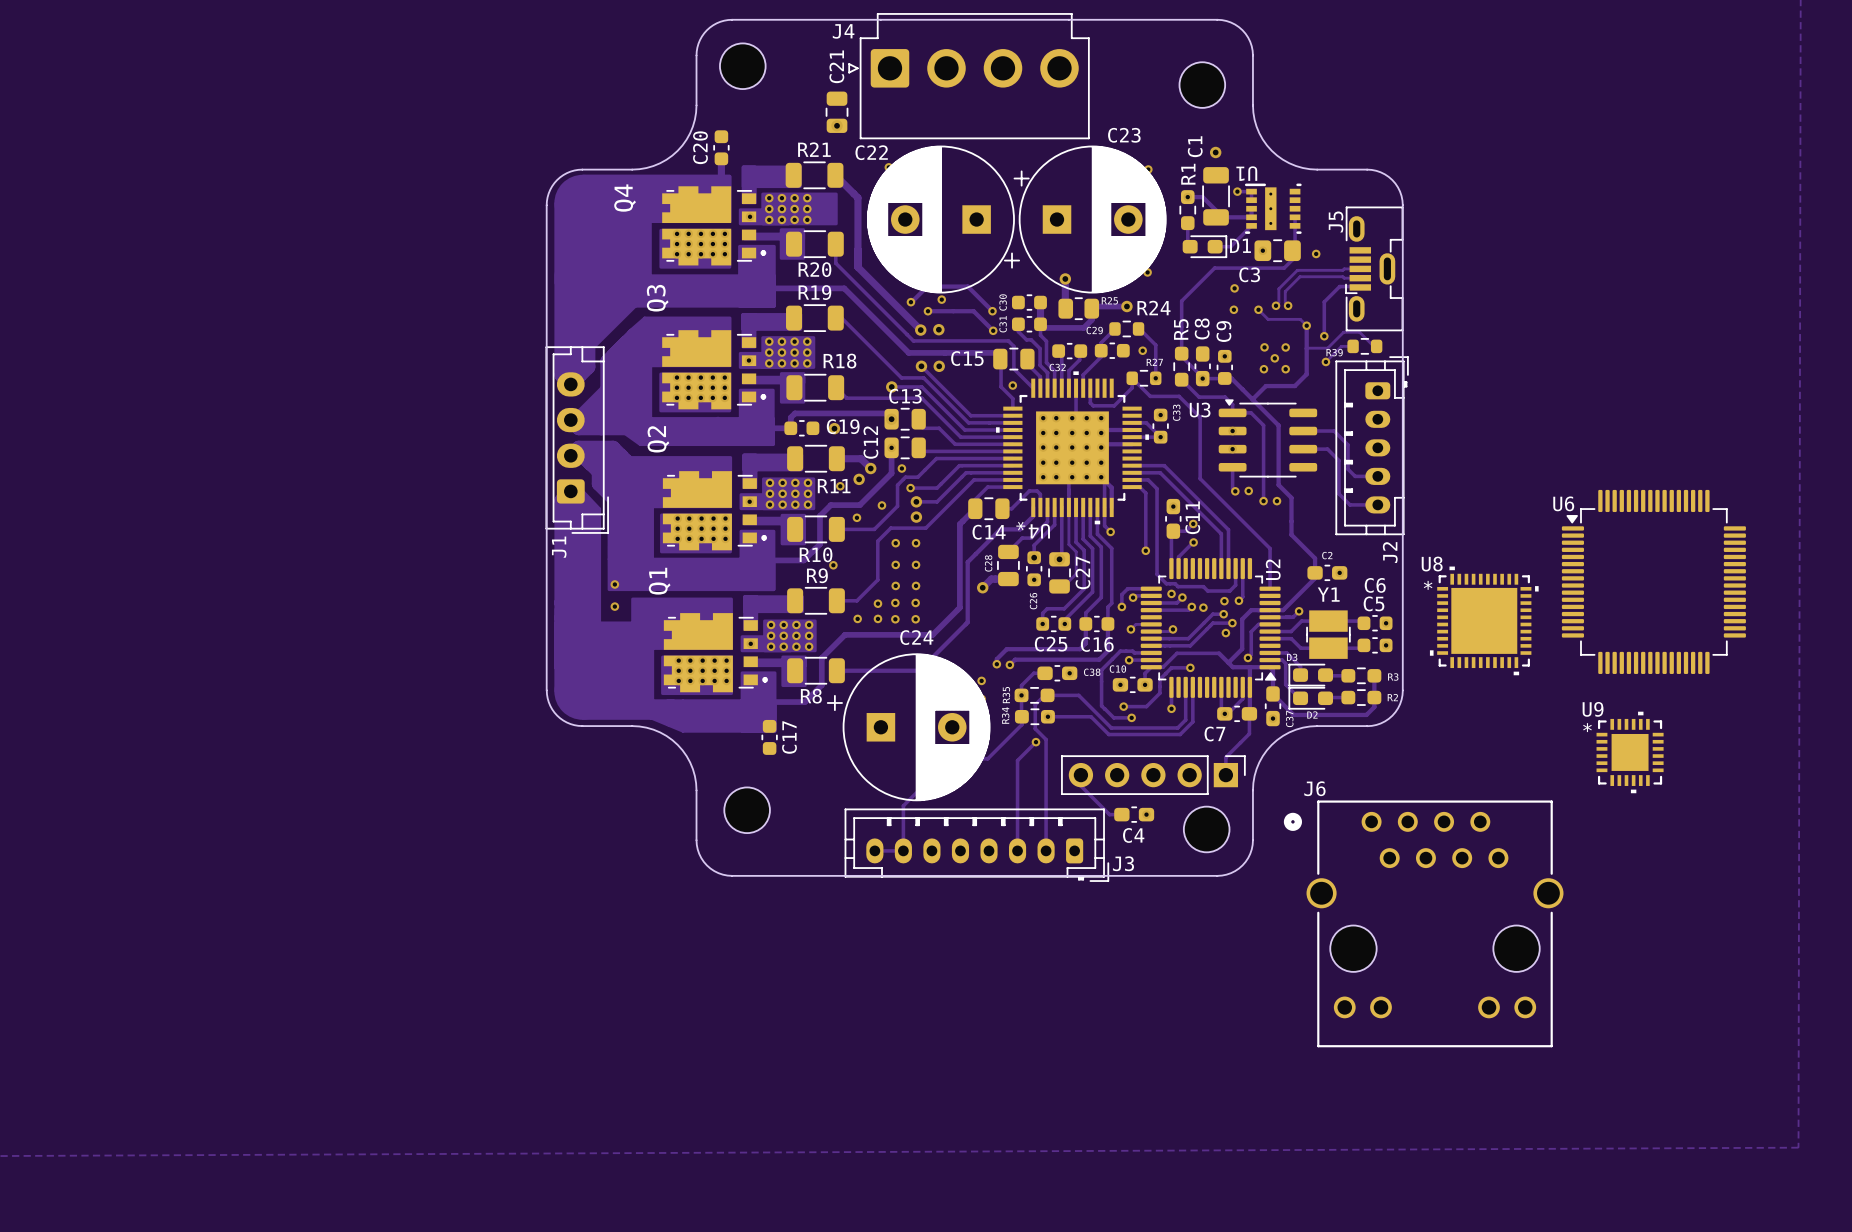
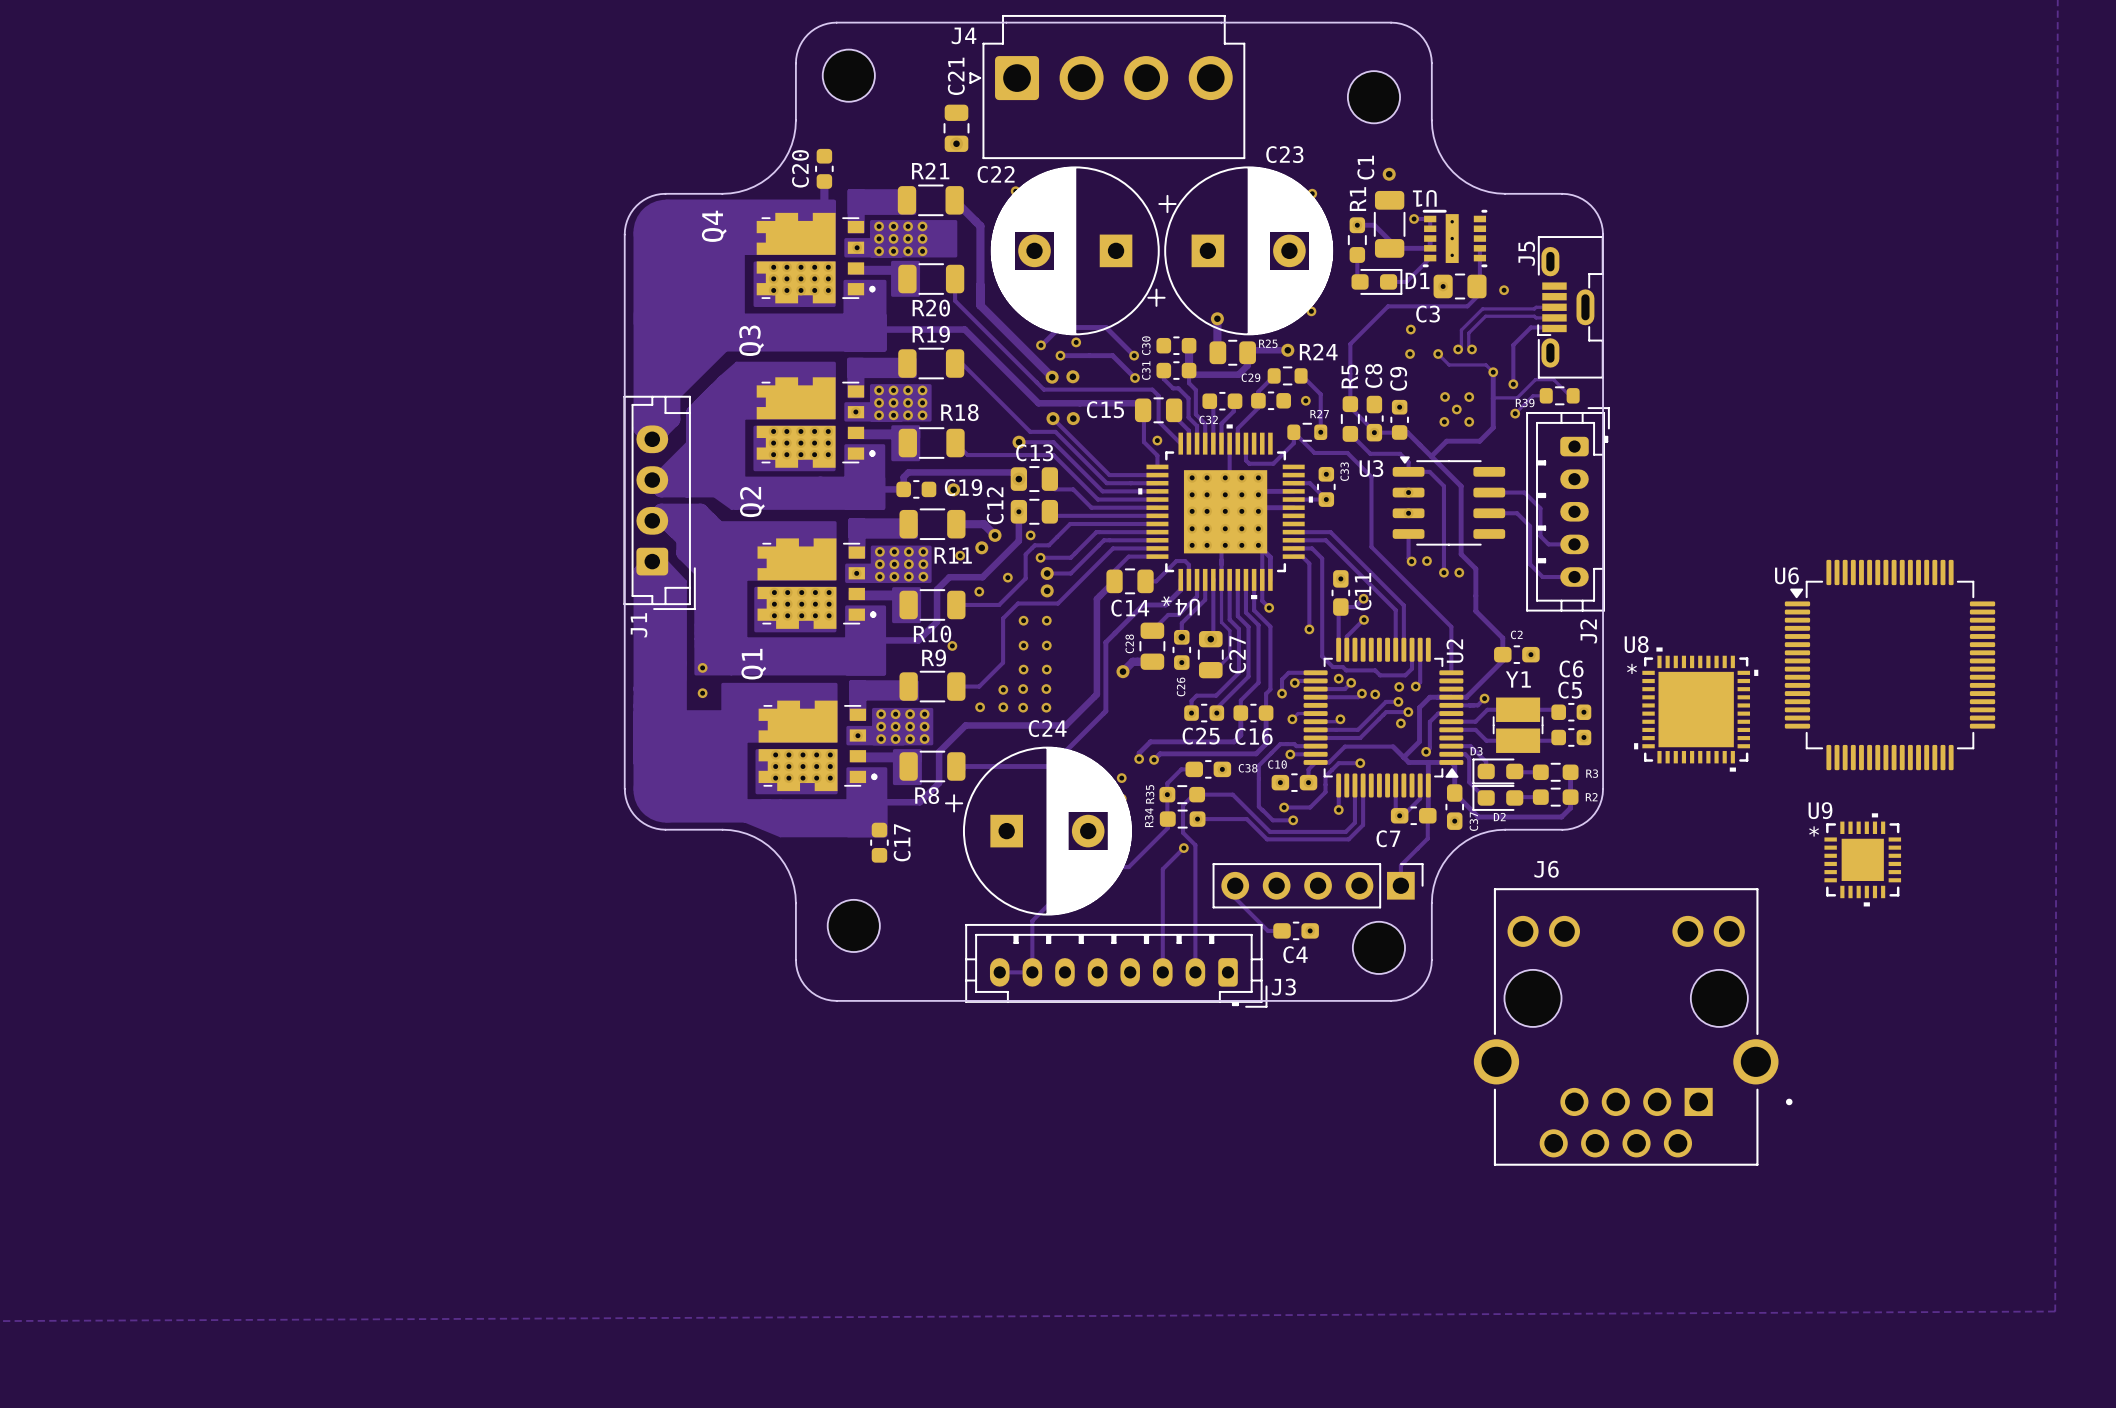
J6 name position: J6 (1314, 788) -> J6 (1546, 869)
J6 footprint: [1283, 800, 1564, 1048] -> [1473, 888, 1793, 1166]

